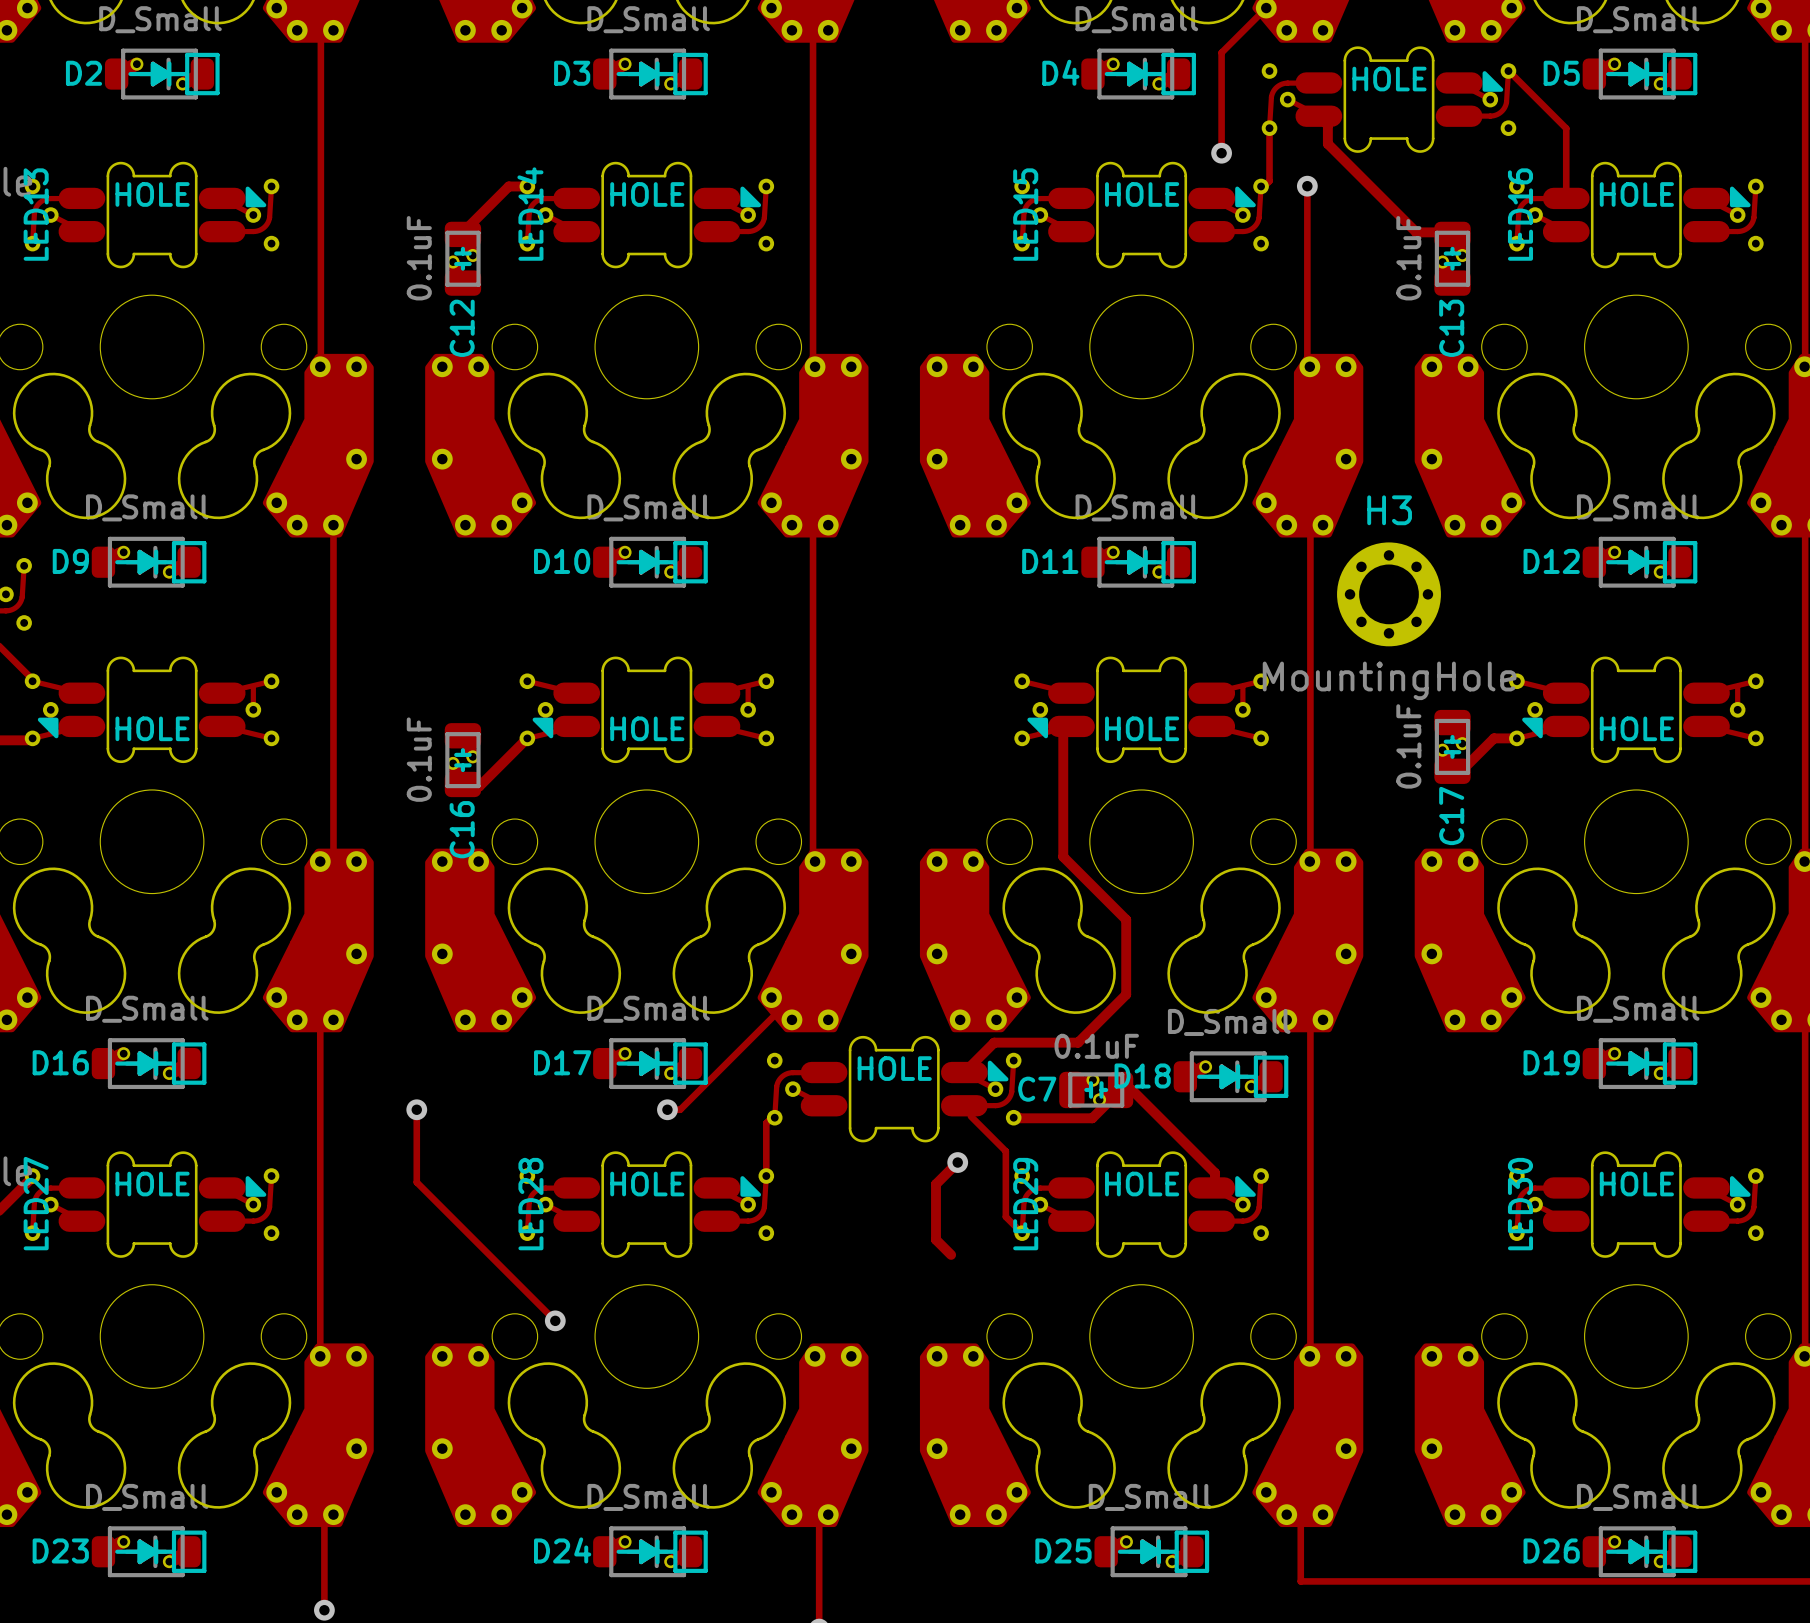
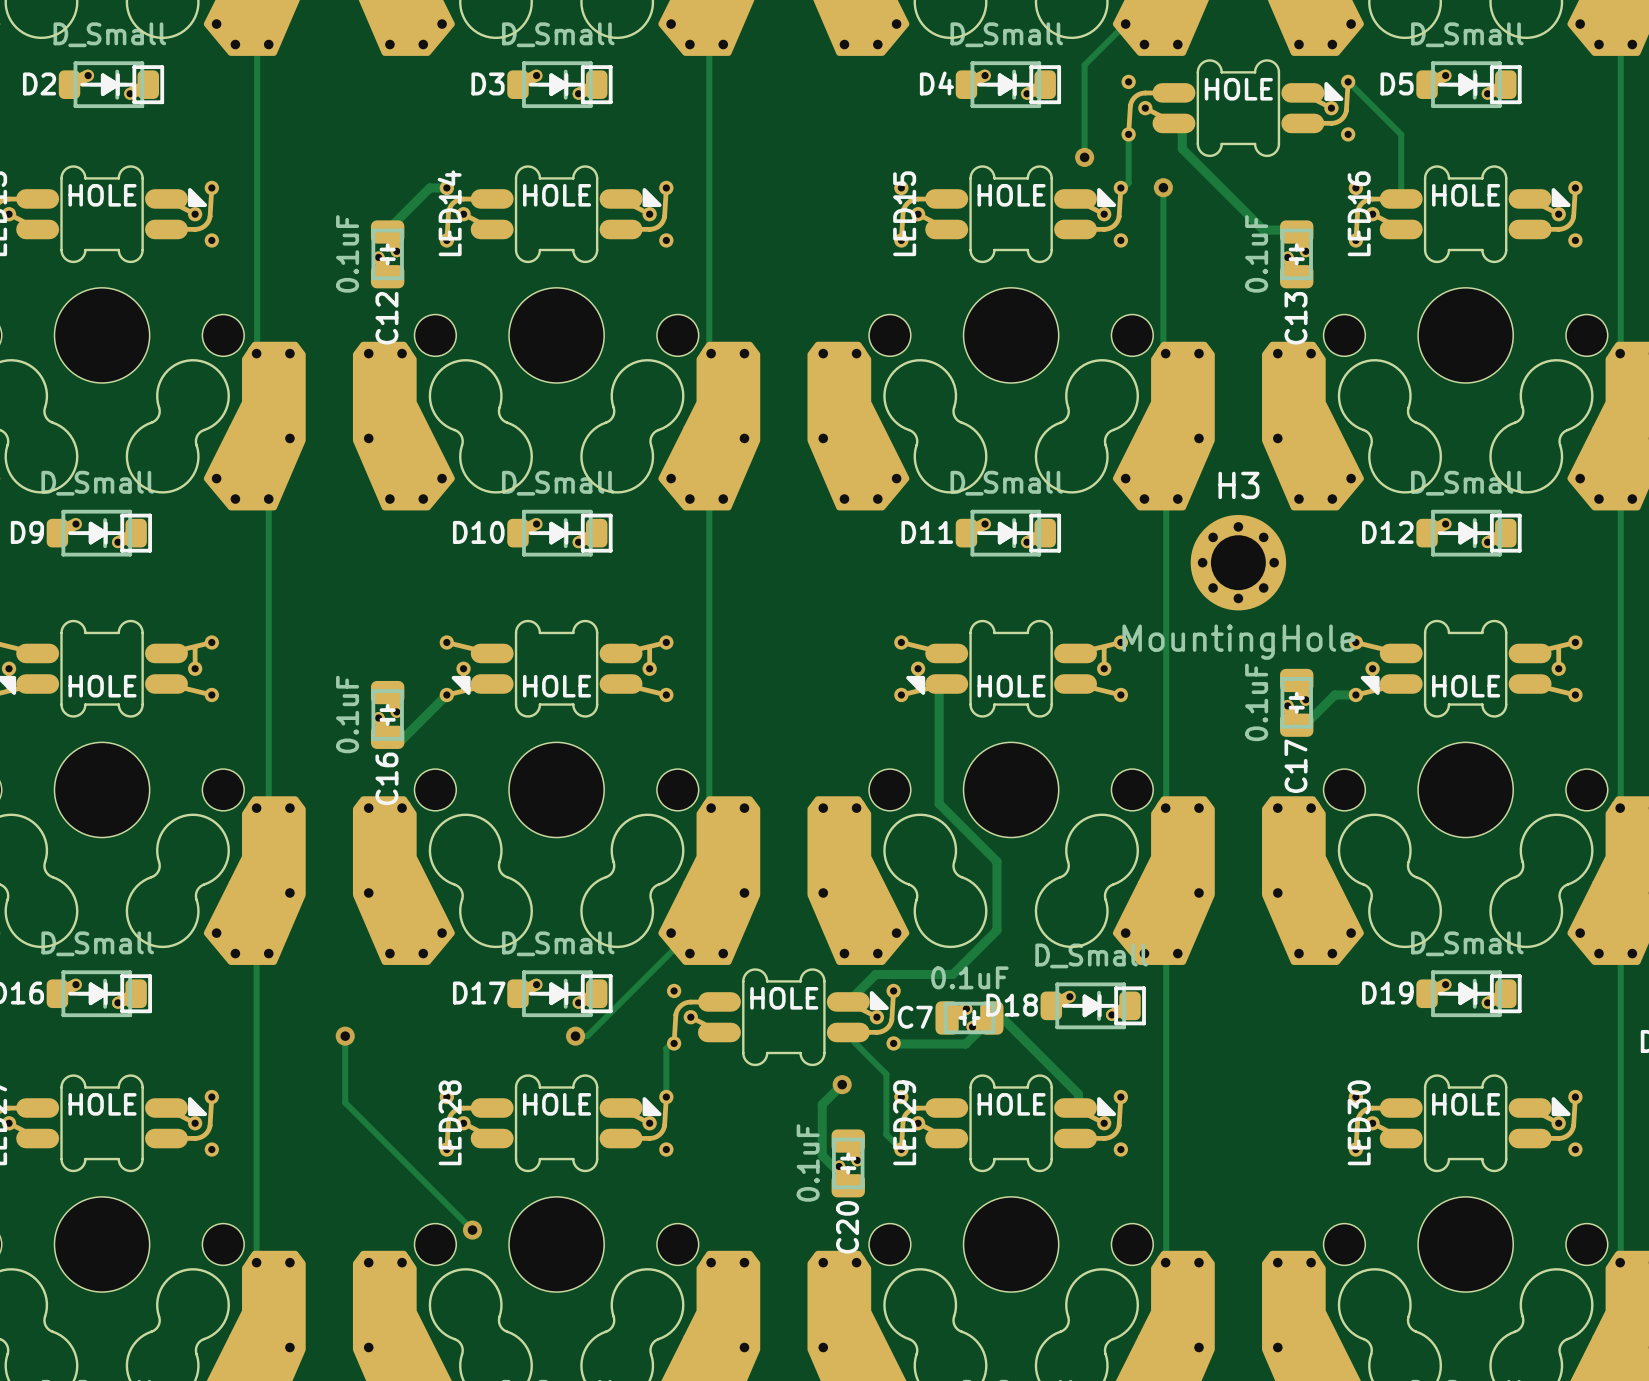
C20: none -> 0.1uF (848, 1163)

